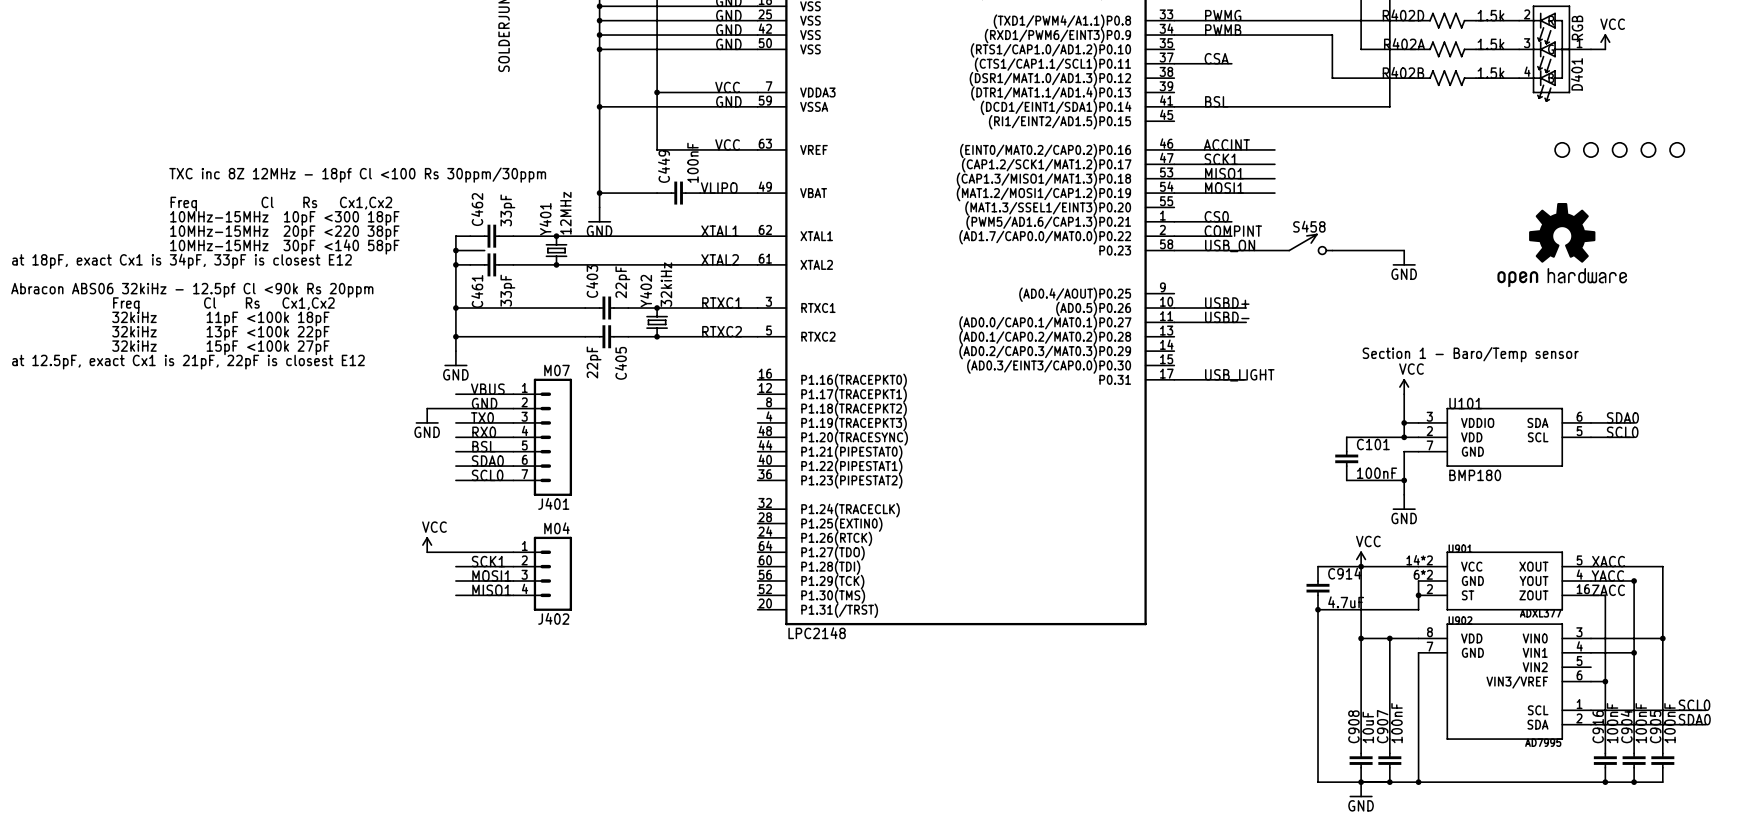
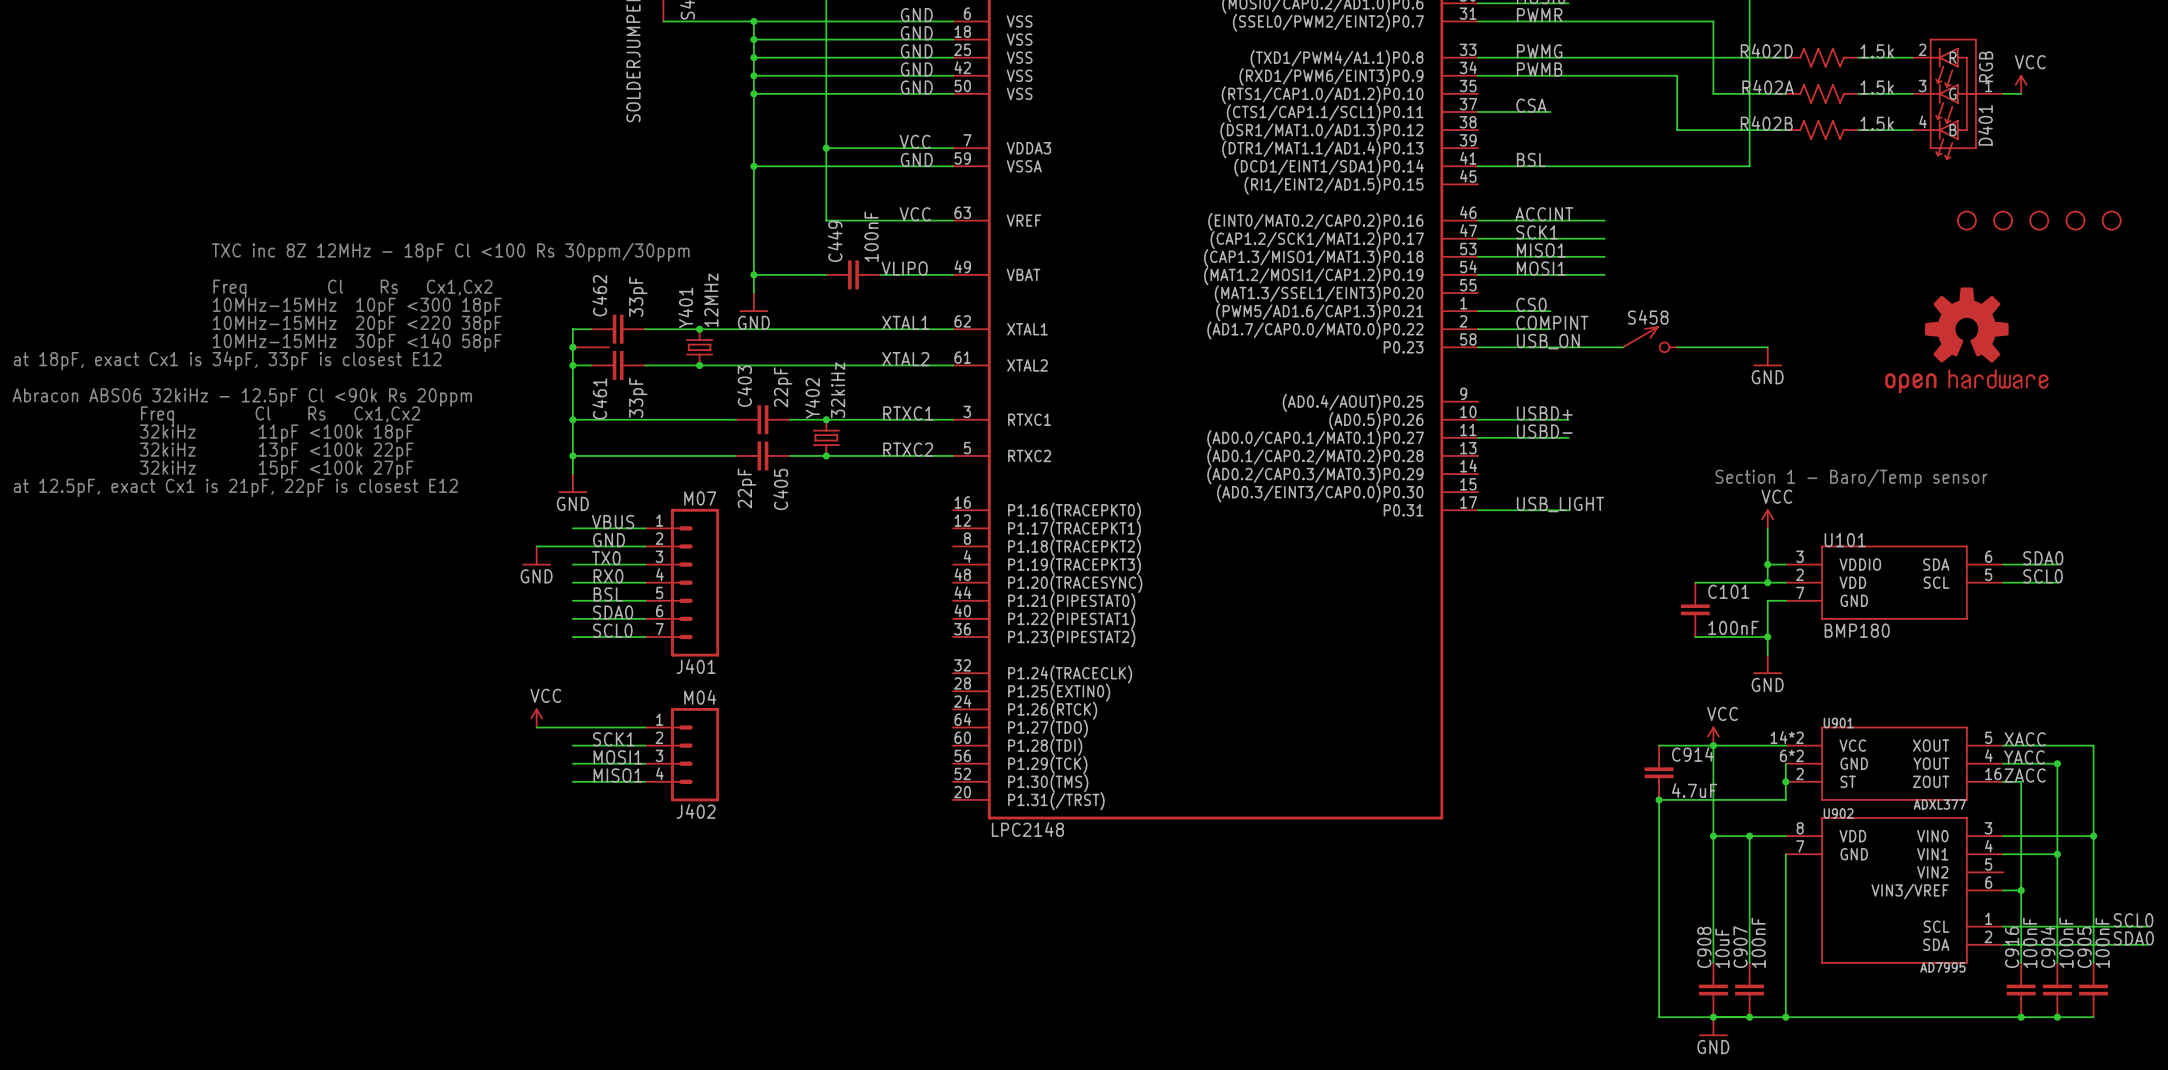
text: TXC inc 8Z 12MHz - 18pf Cl <100 Rs 30ppm/30ppm (357, 175) -> TXC inc 8Z 12MHz - 18pF Cl <100 Rs 30ppm/30ppm (450, 252)
text: Abracon ABS06 32kiHz - 12.5pf Cl <90k Rs 20ppm (192, 290) -> Abracon ABS06 32kiHz - 12.5pF Cl <90k Rs 20ppm (242, 397)

